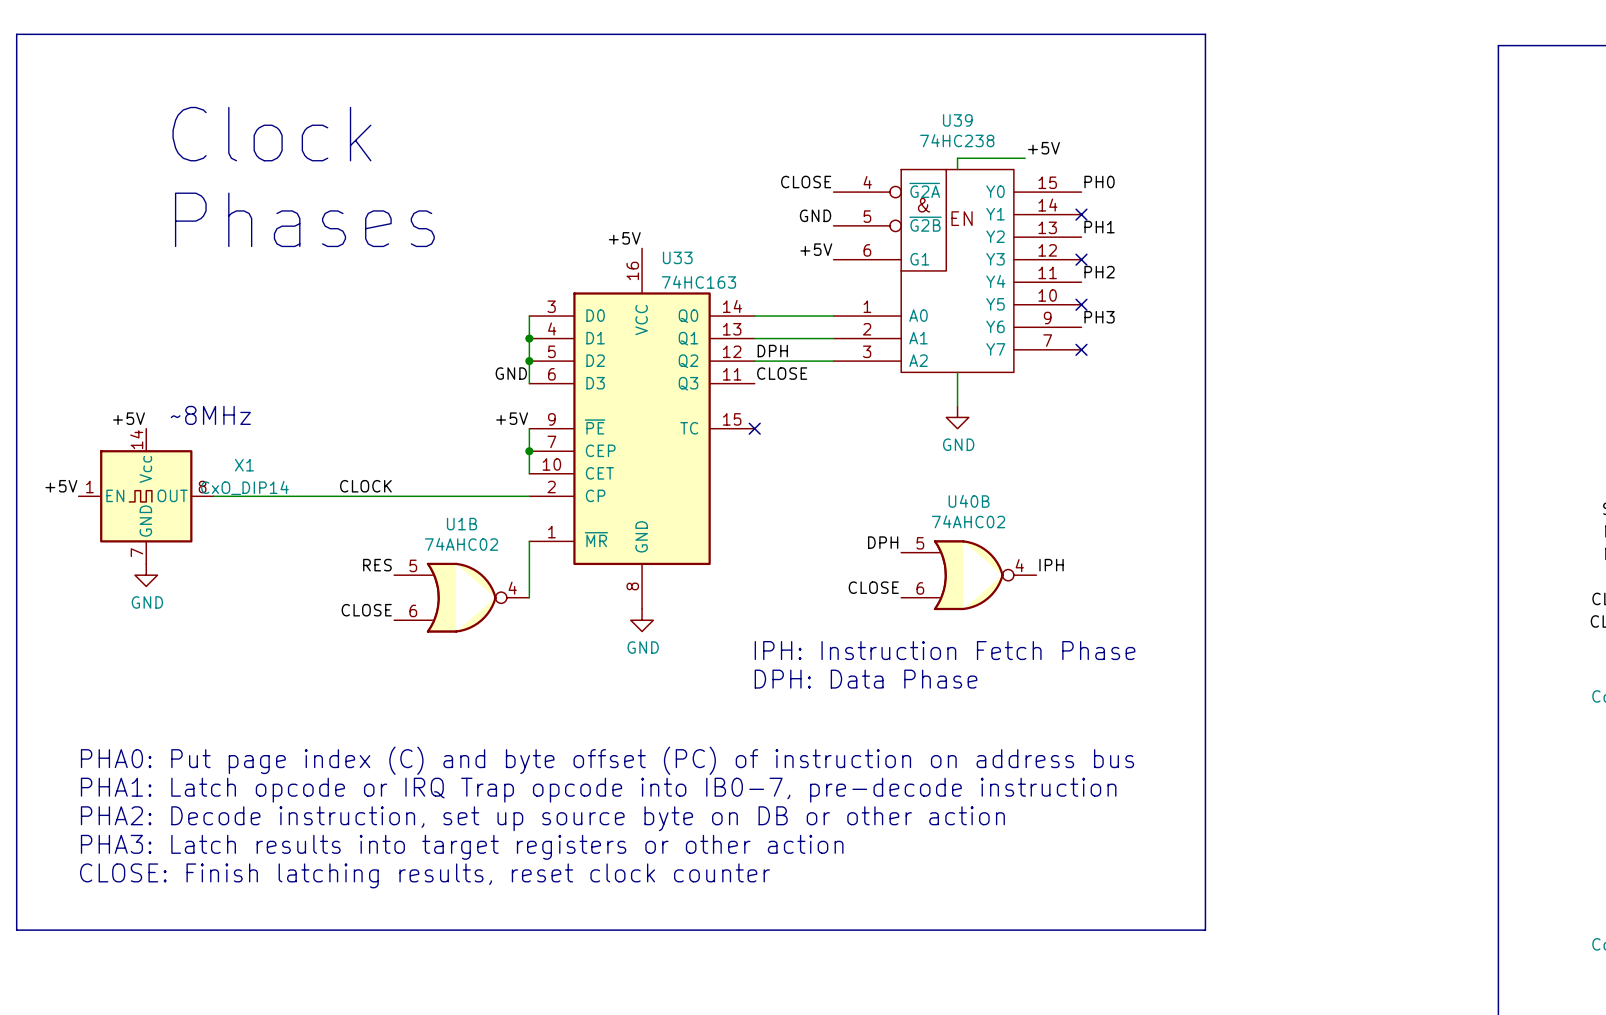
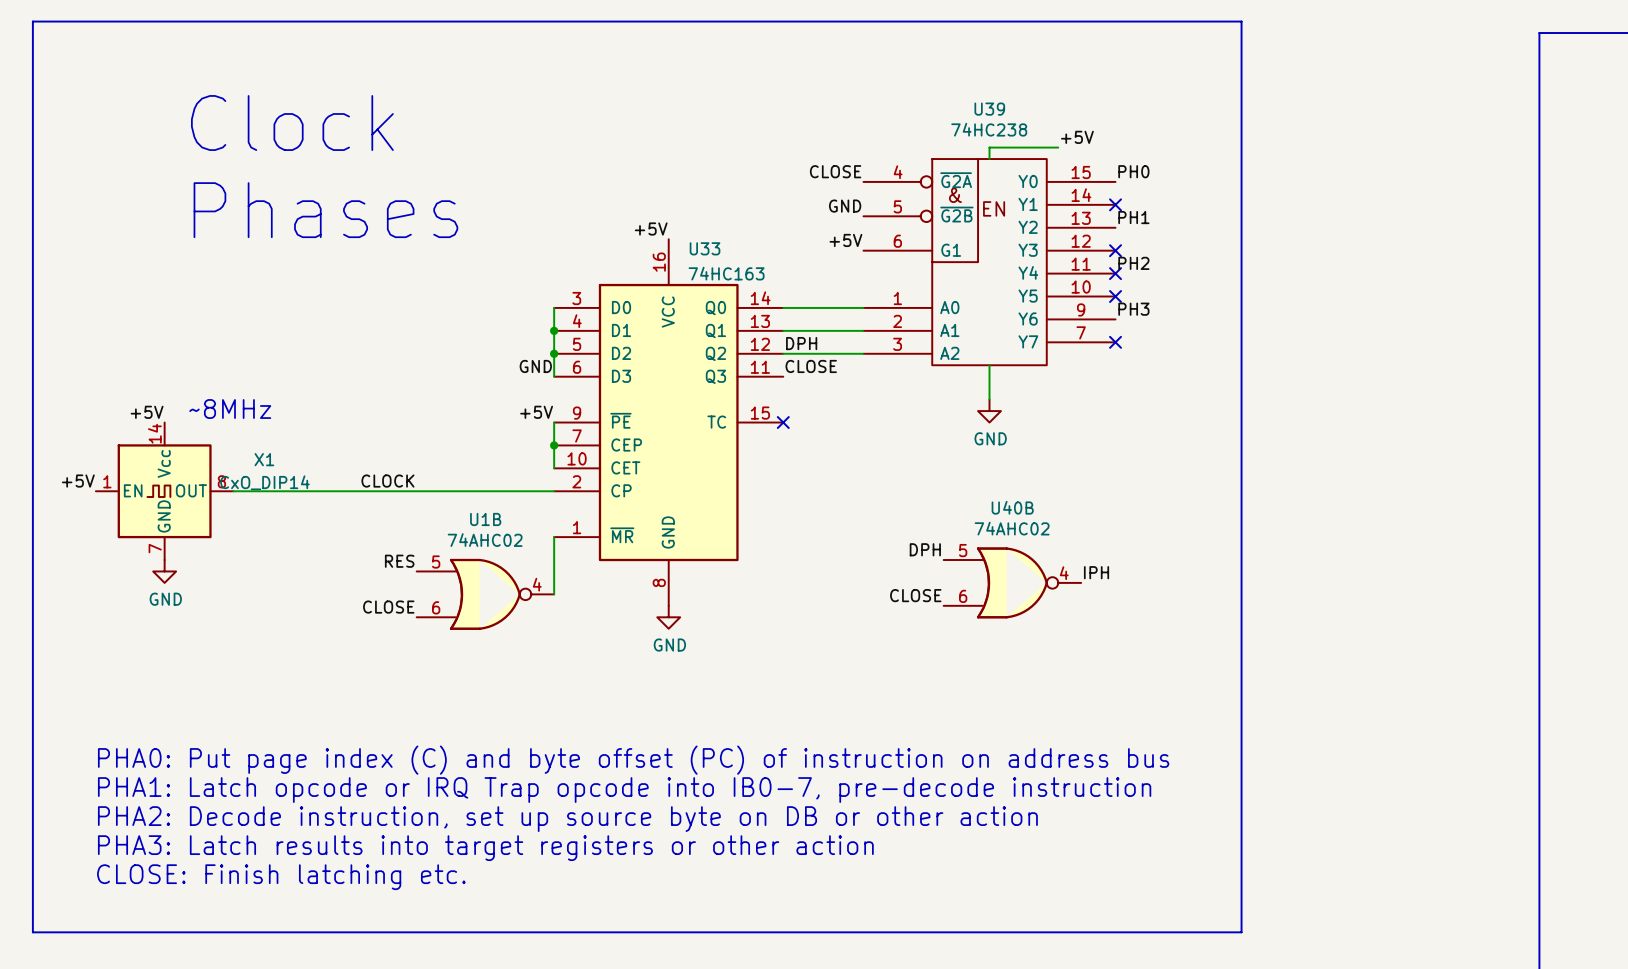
no-connect mark: none -> (1115, 273)
label position: DPH (883, 542) -> DPH (925, 549)
label position: IPH (1051, 565) -> IPH (1096, 572)
U40B position: (968, 575) -> (1012, 582)
label position: CLOSE (873, 587) -> CLOSE (915, 595)
text: IPH: Instruction Fetch Phase (945, 650) -> none
text: DPH: Data Phase (866, 679) -> none
text: CLOSE: Finish latching results, reset clock counter (425, 875) -> CLOSE: Finish latching etc. (281, 877)

